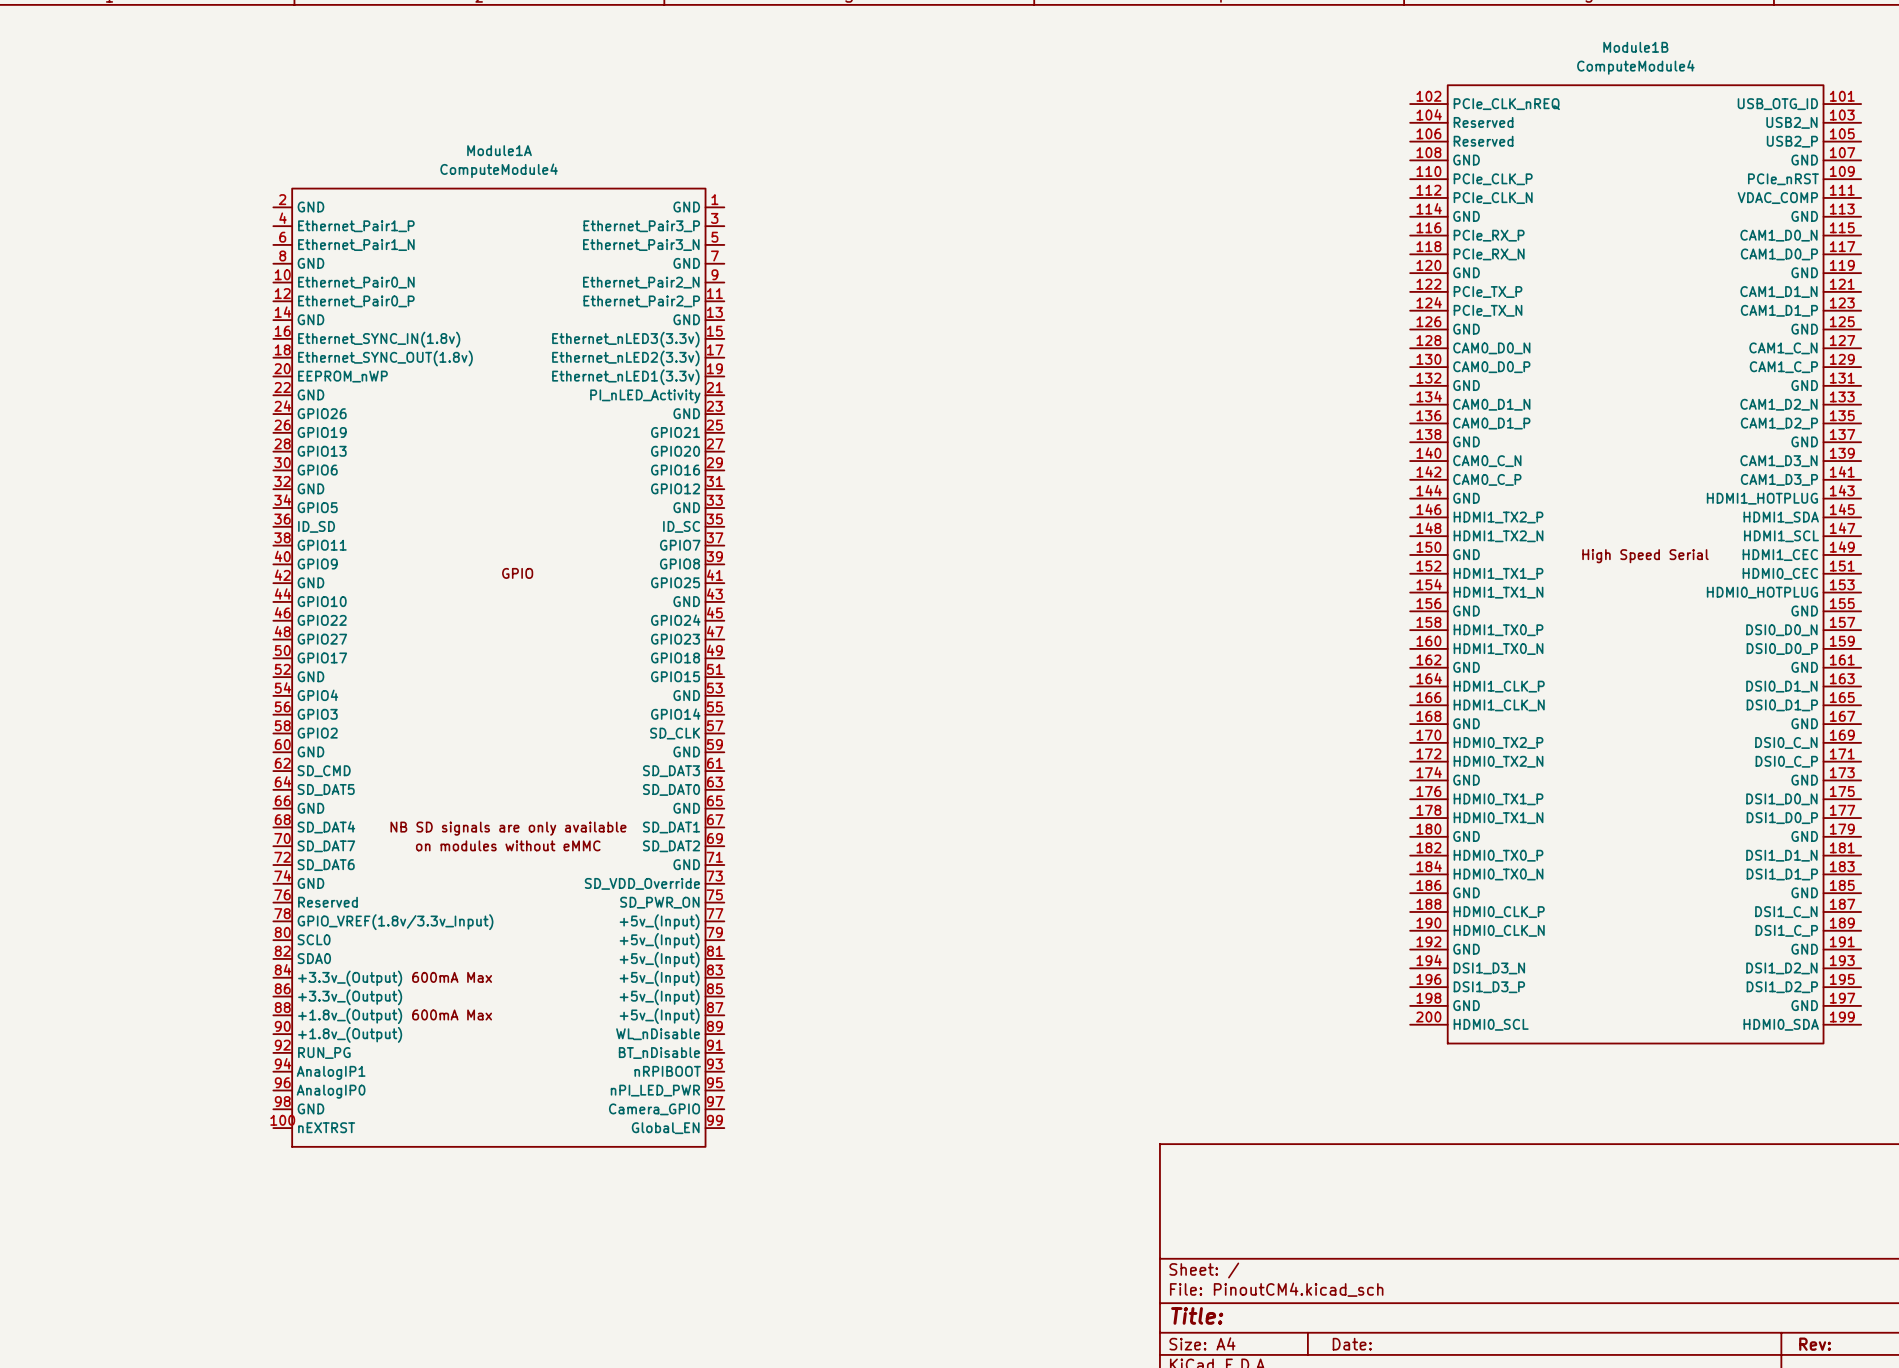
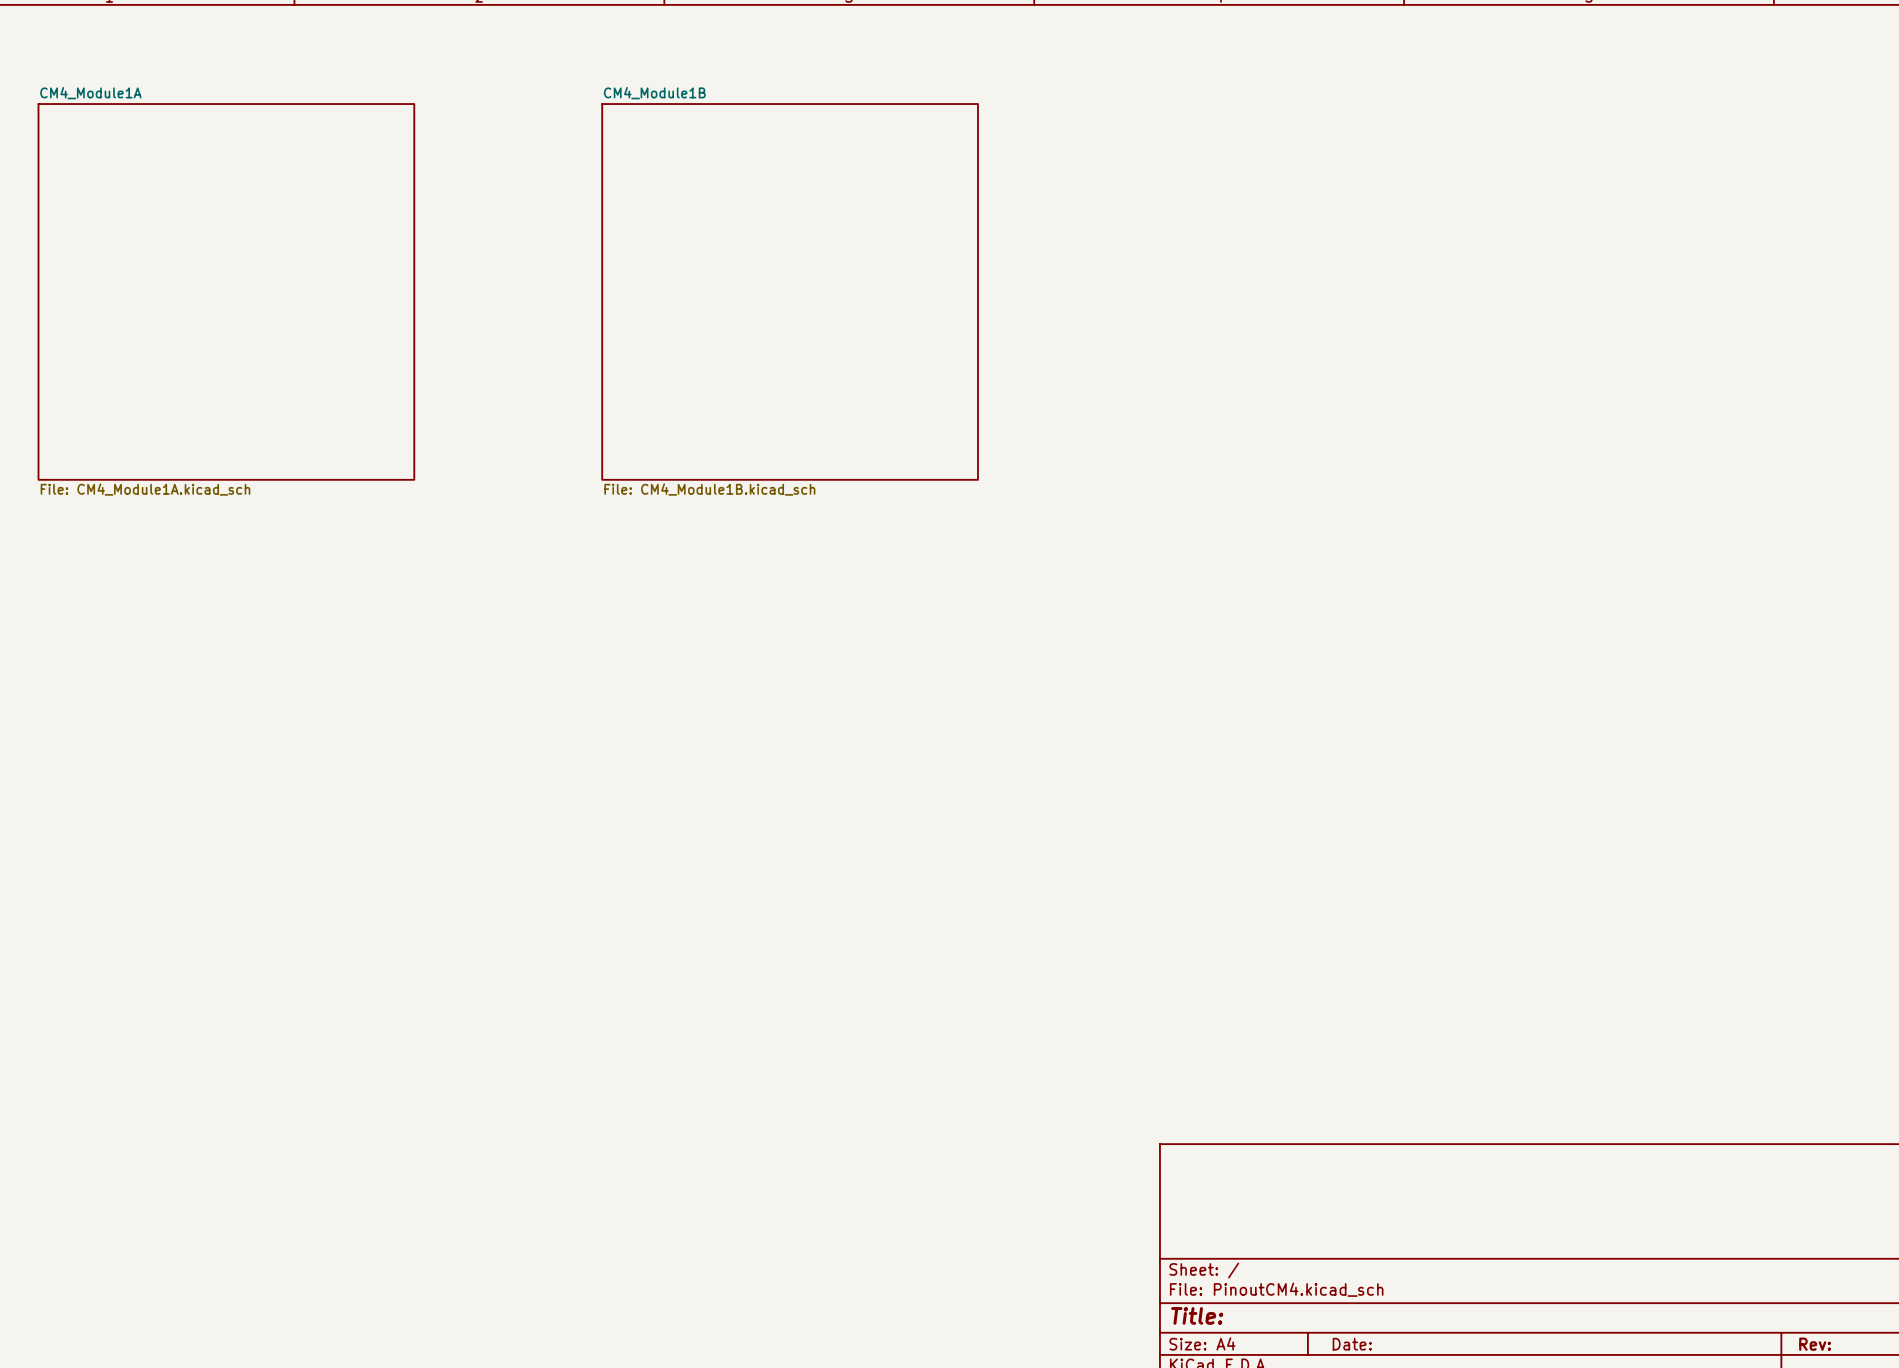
sheet CM4_Module1A: none -> File: CM4_Module1A.kicad_sch (226, 291)
sheet CM4_Module1B: none -> File: CM4_Module1B.kicad_sch (790, 291)
Module1B: ComputeModule4 (1635, 564) -> none
Module1A: ComputeModule4 (498, 667) -> none

